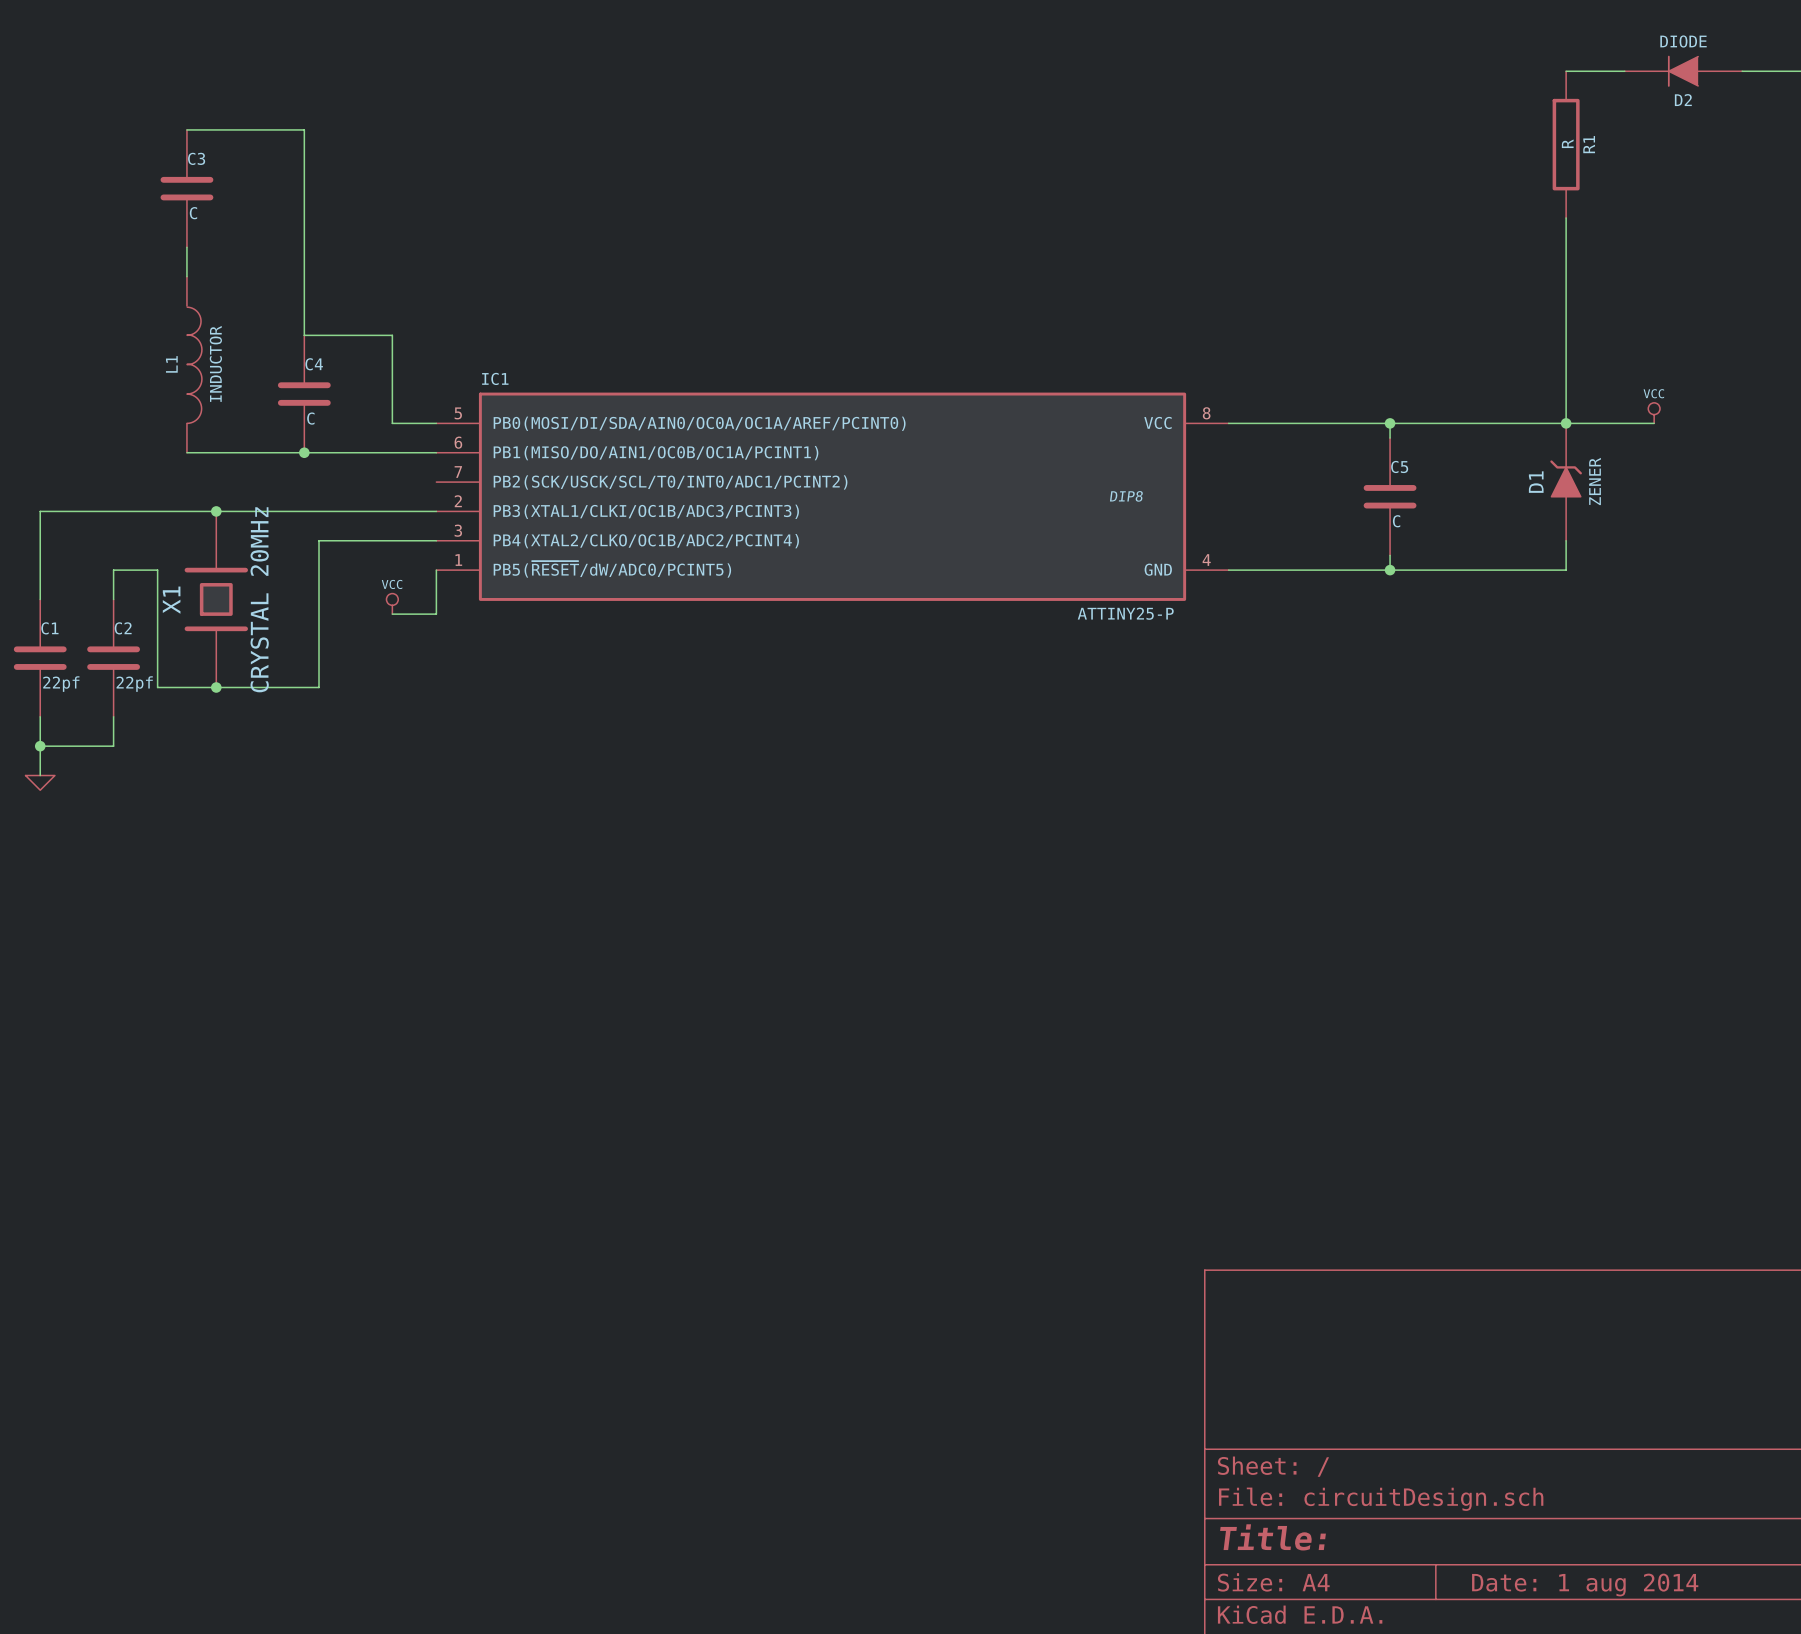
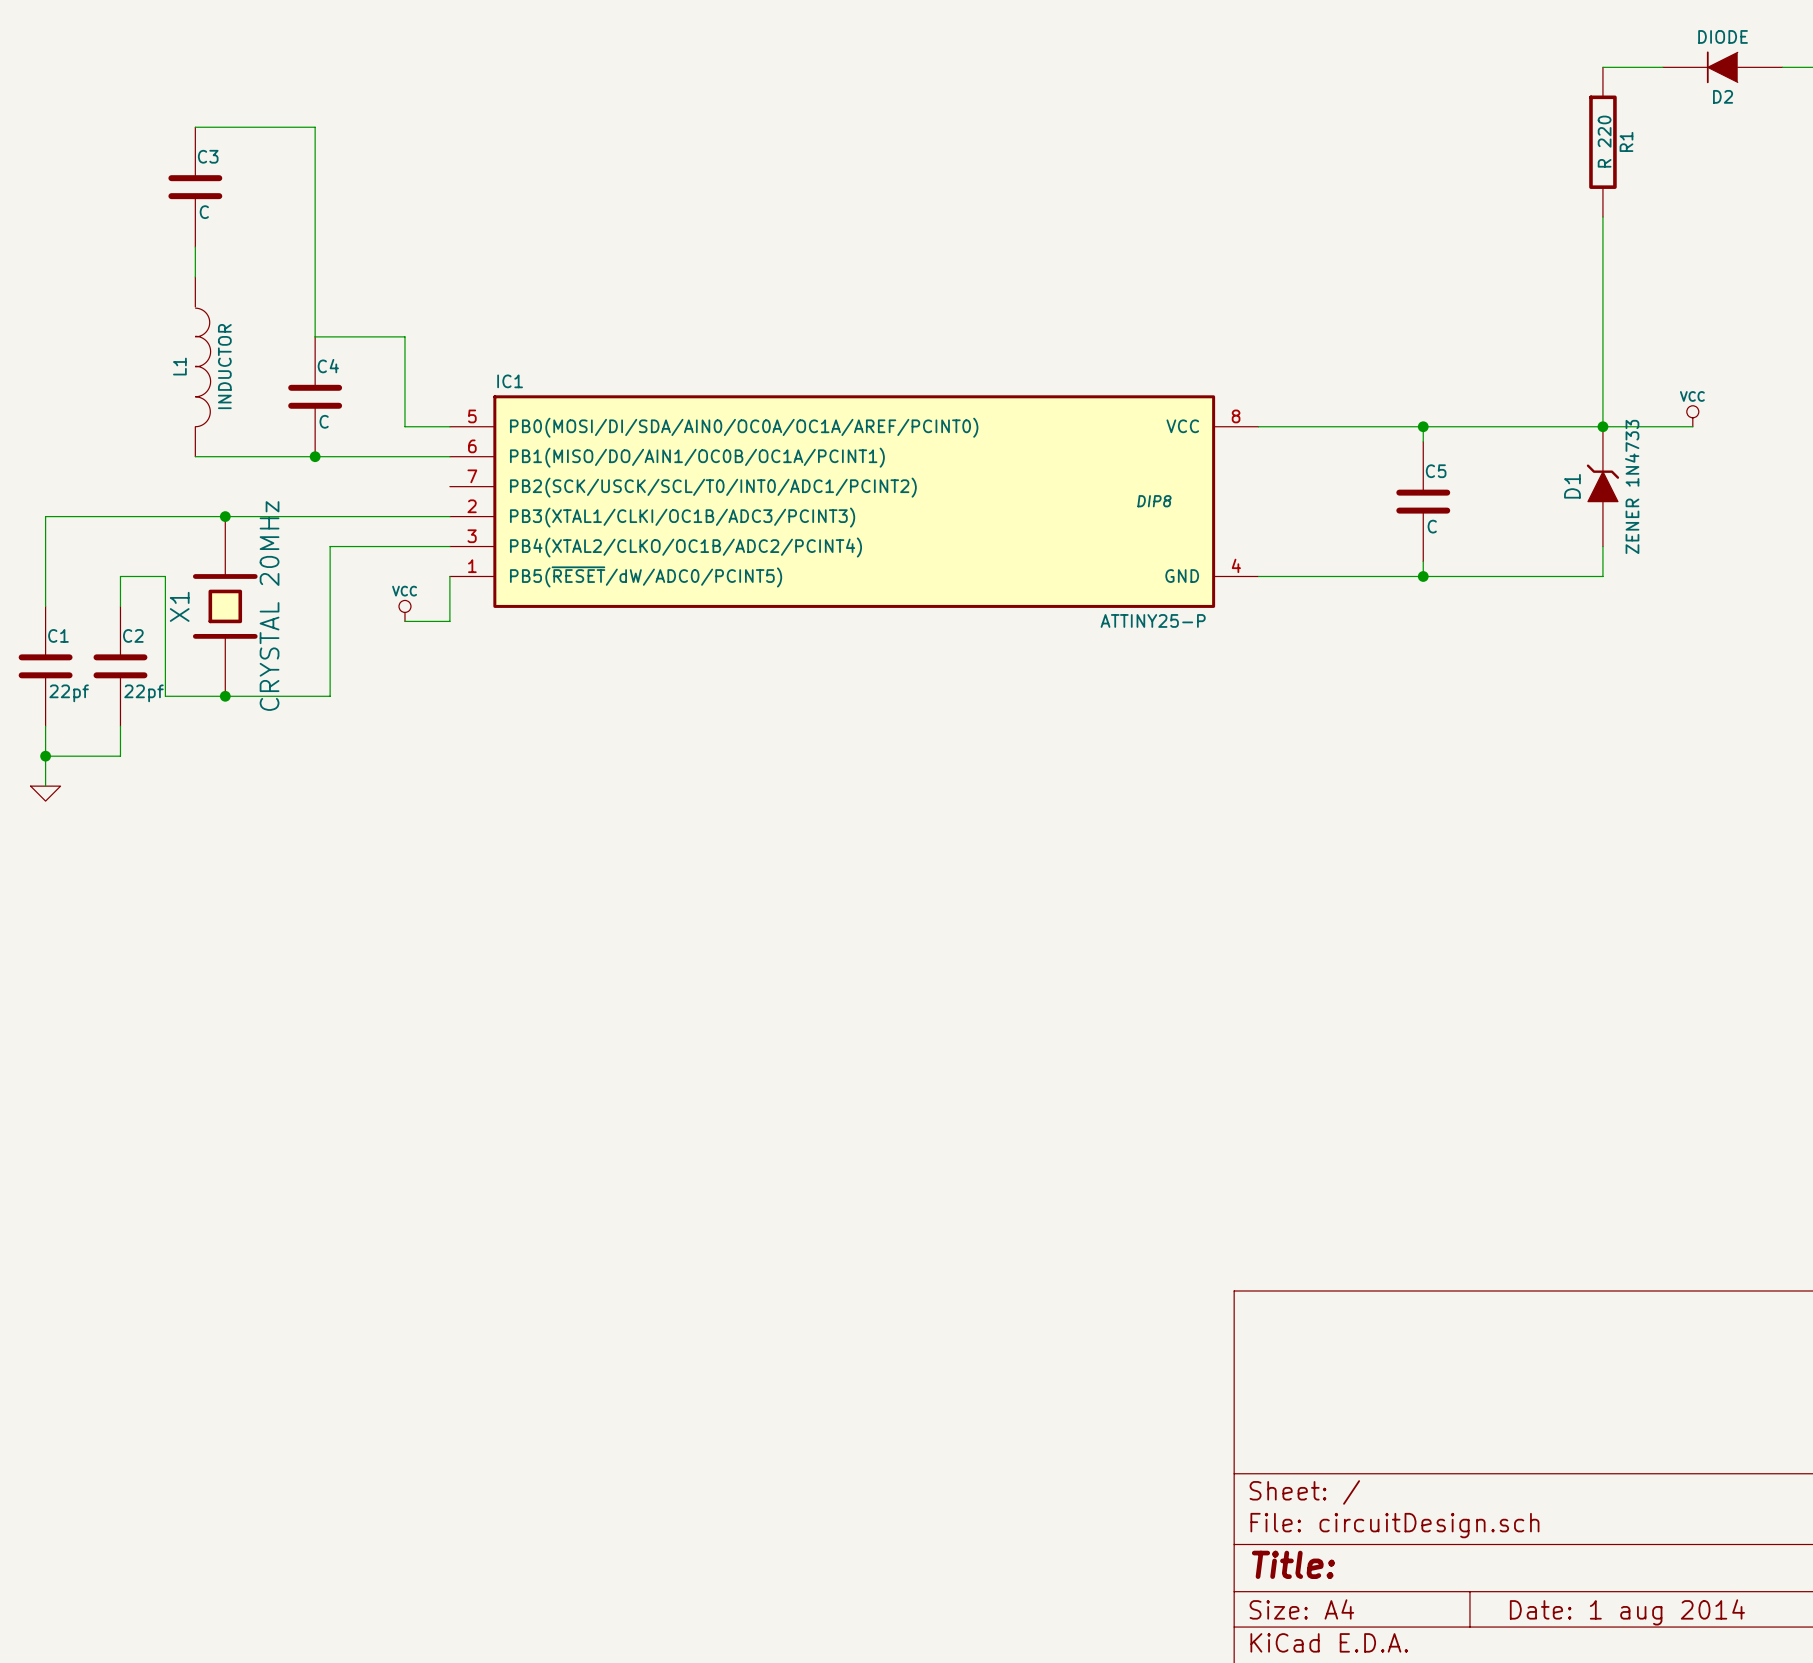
R1 value: R (1567, 143) -> R 220 (1604, 141)
D1 value: ZENER (1595, 481) -> ZENER 1N4733 (1632, 486)

